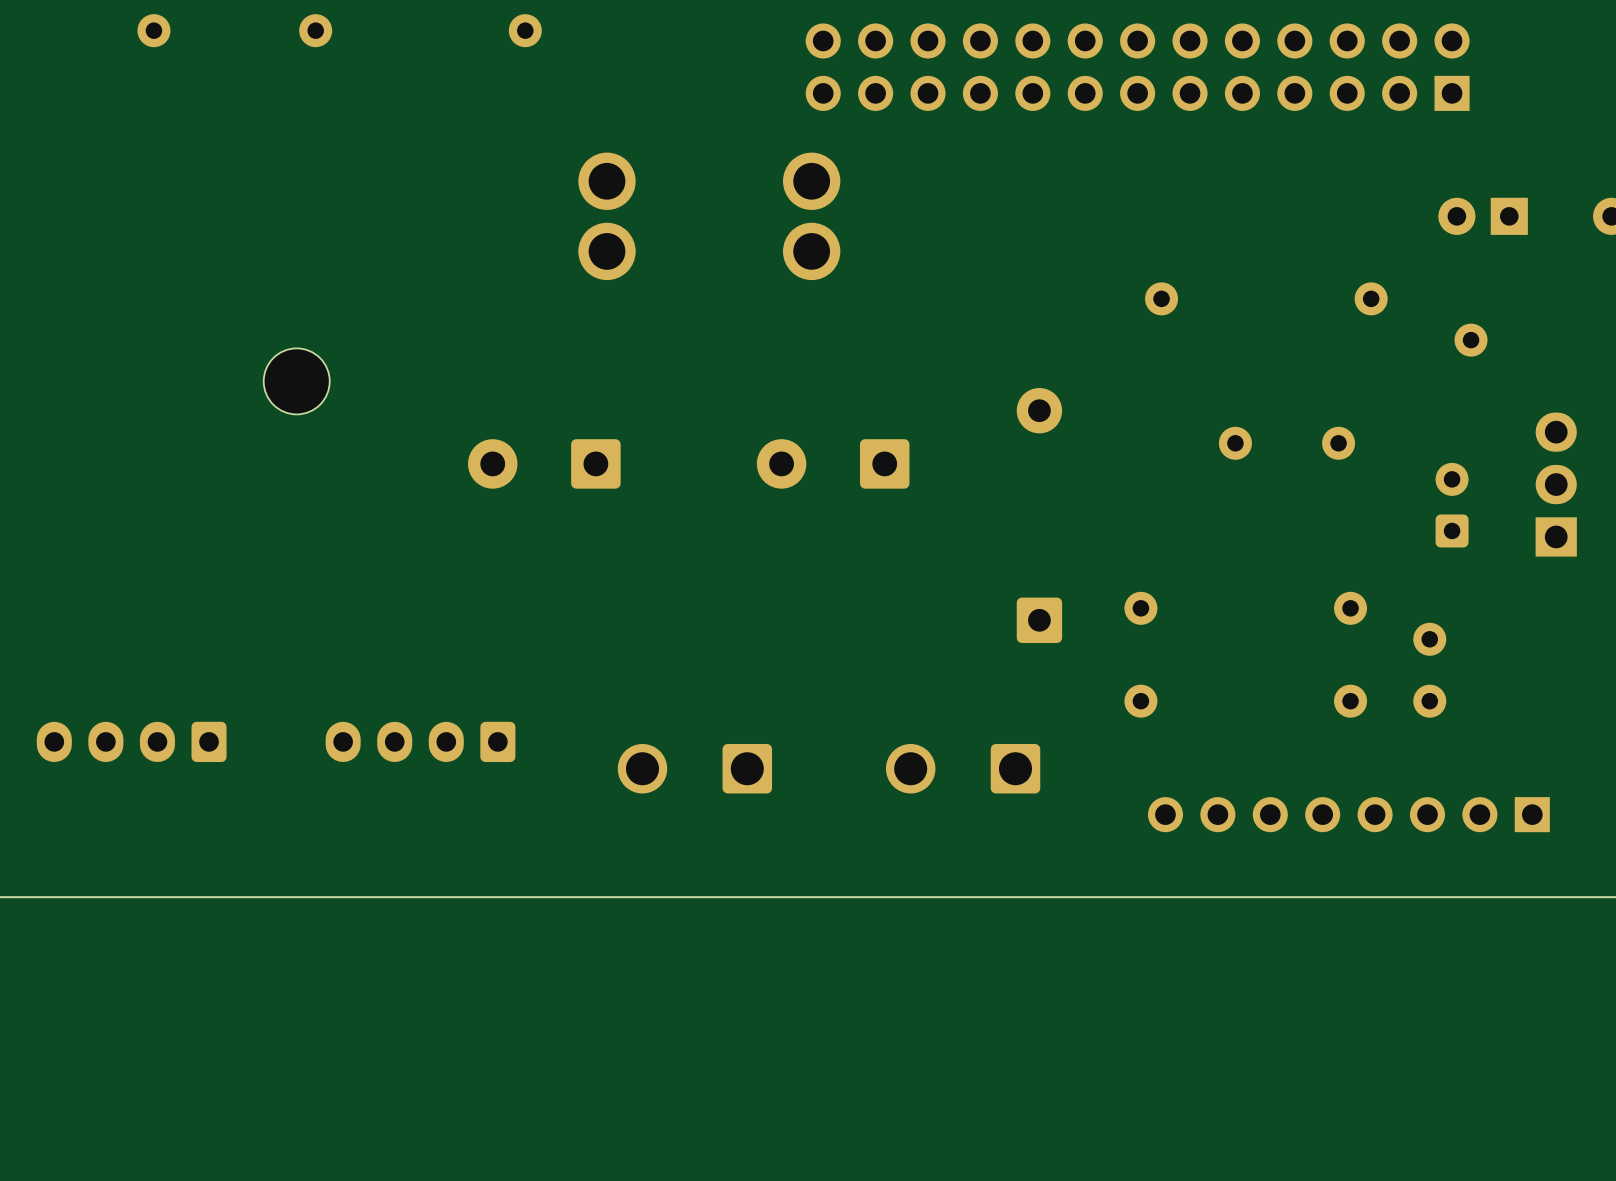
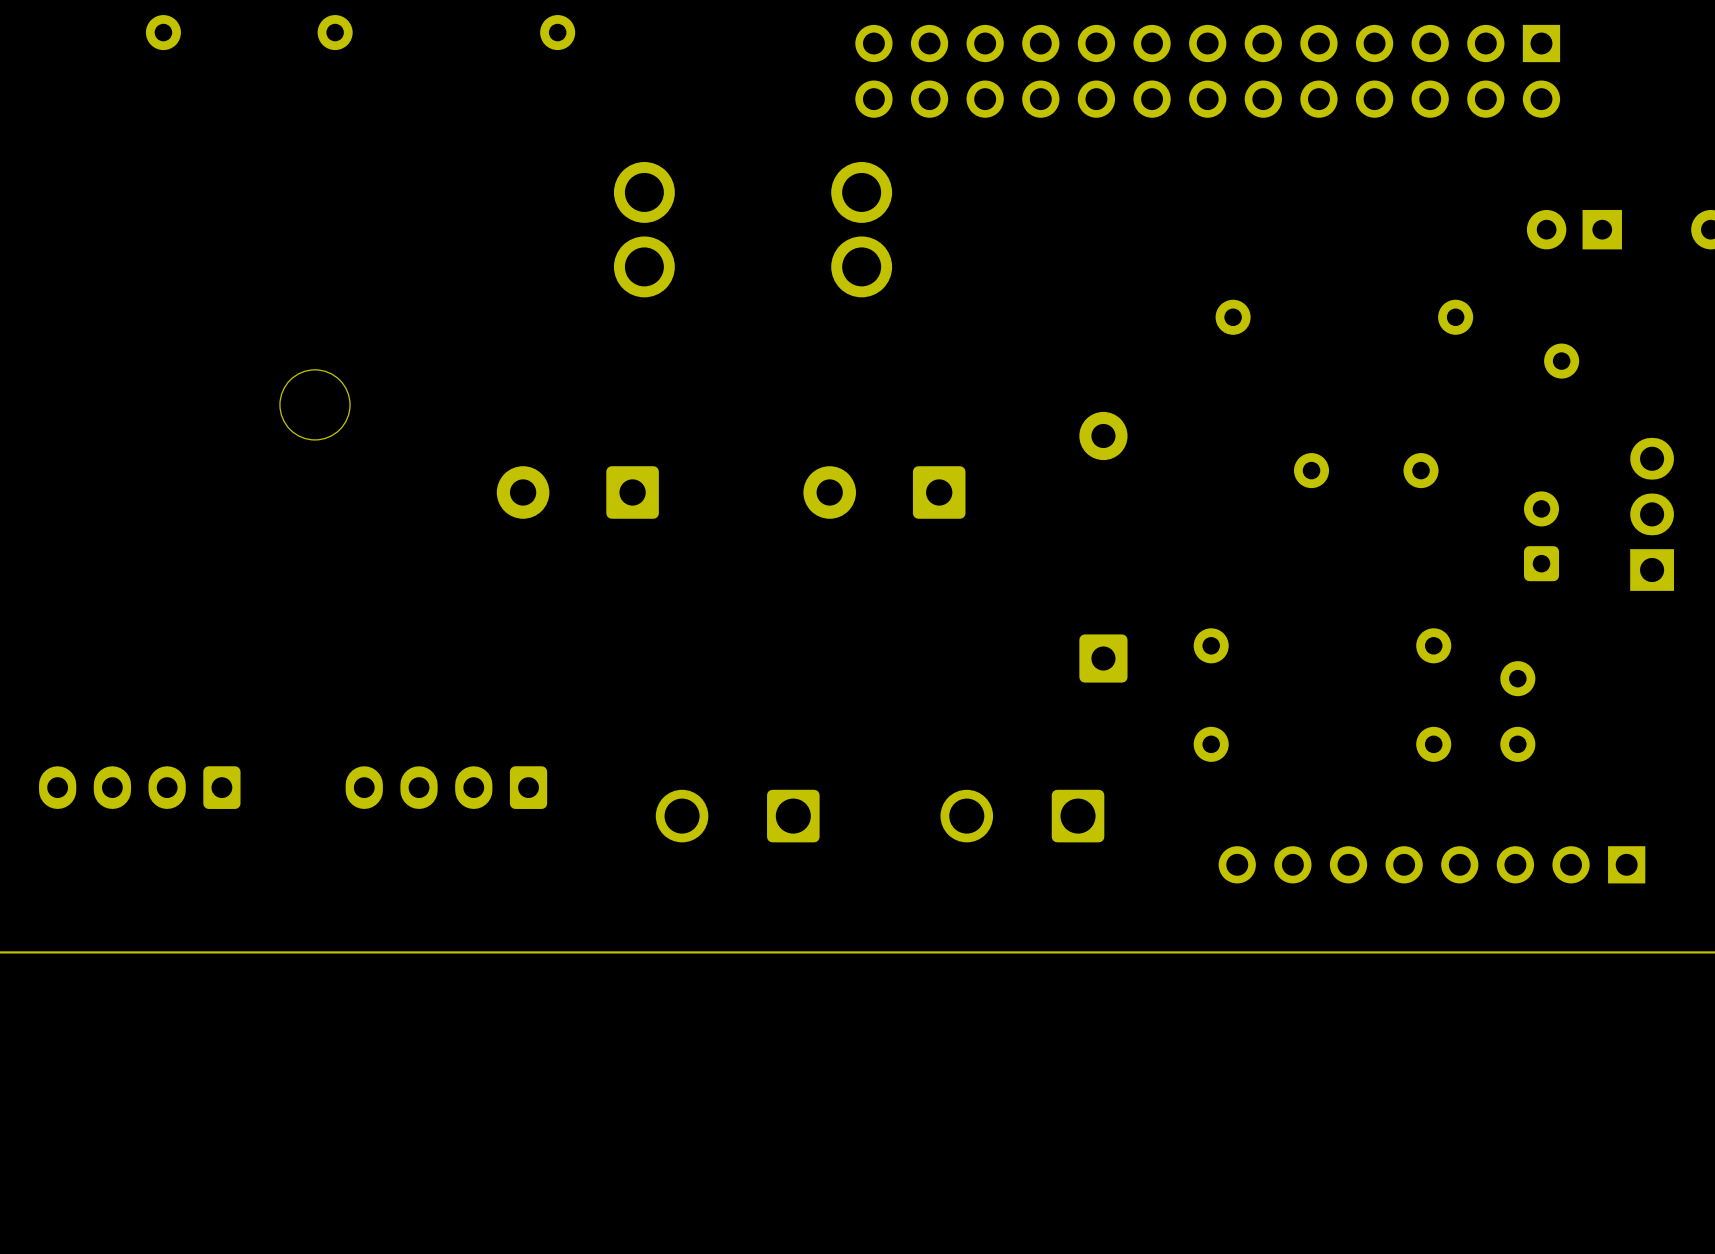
part footprint: [805, 23, 1470, 111] -> [855, 24, 1561, 118]

